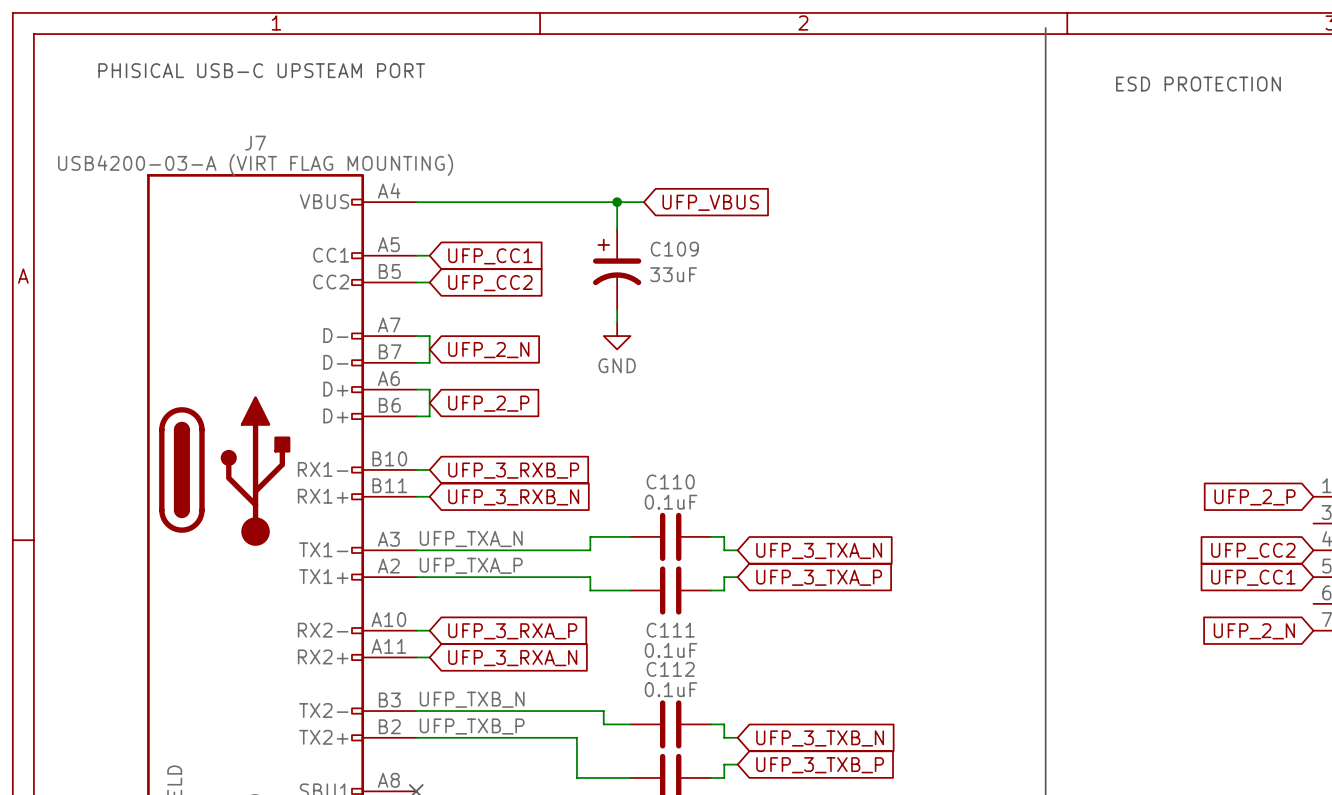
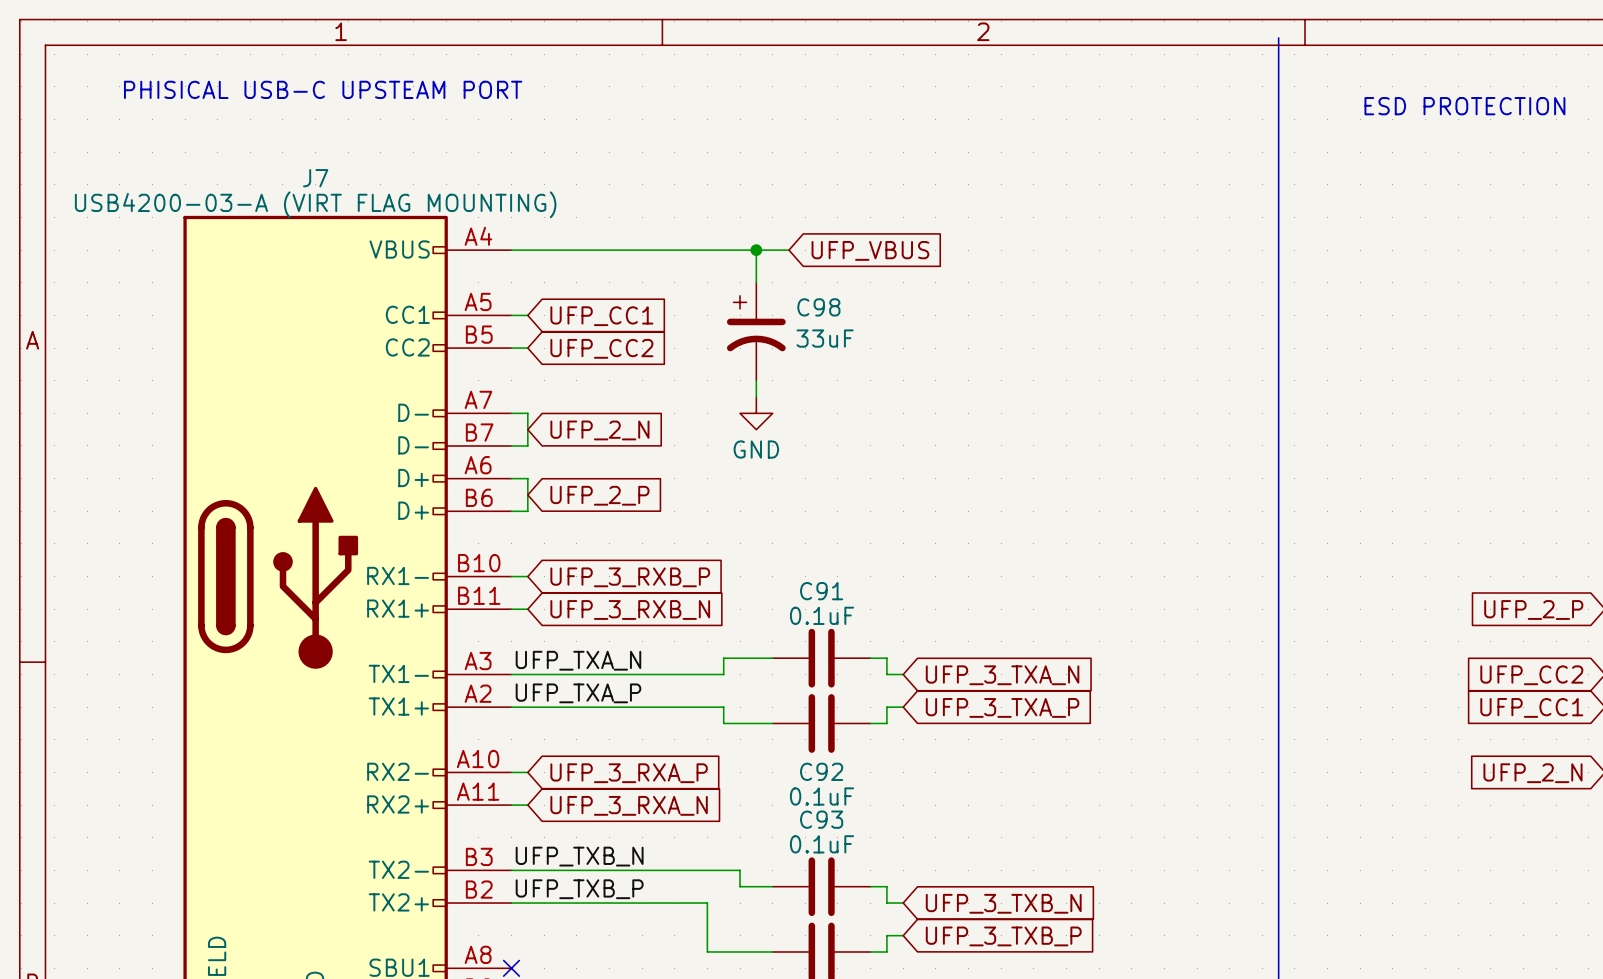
C109 name: C109 (674, 249) -> C98 (818, 307)
C110 name: C110 (670, 481) -> C91 (821, 591)
C111 name: C111 (670, 630) -> C92 (821, 771)
C112 name: C112 (670, 669) -> C93 (821, 819)

